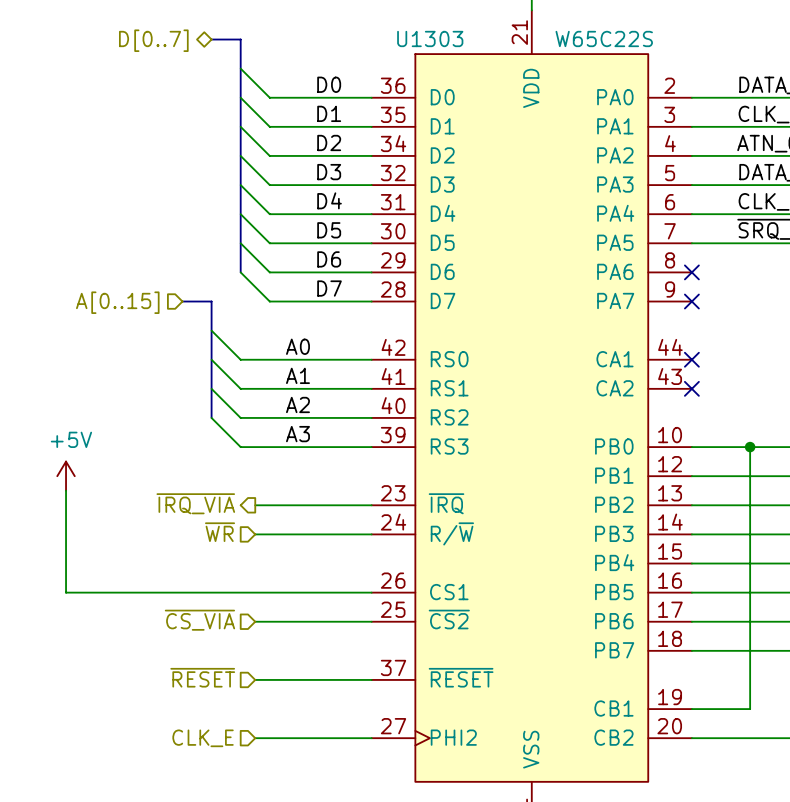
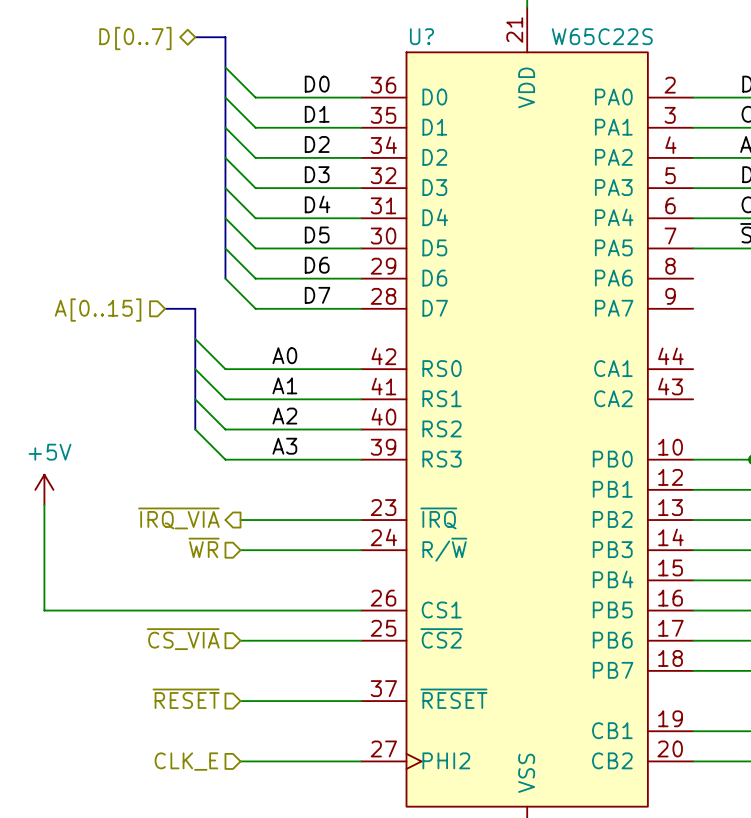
U1303 name: U1303 (430, 38) -> U? (421, 36)
no-connect mark: (691, 272) -> none
no-connect mark: (691, 301) -> none
no-connect mark: (691, 359) -> none
no-connect mark: (691, 388) -> none

